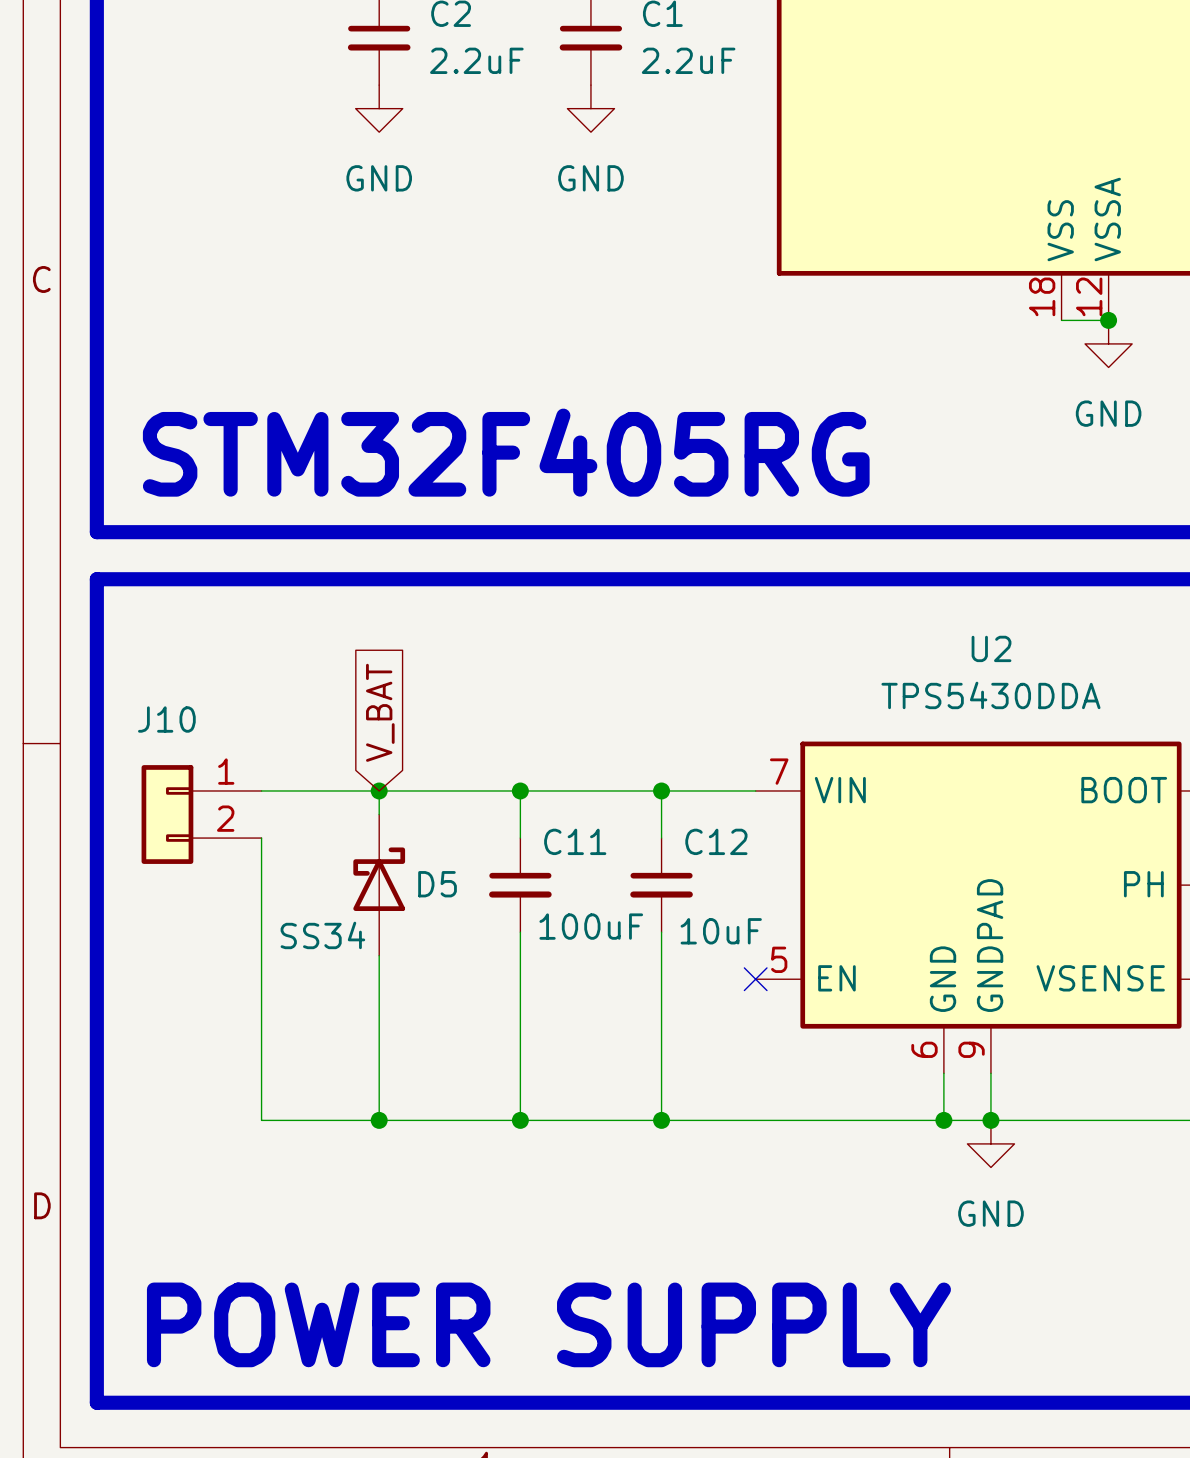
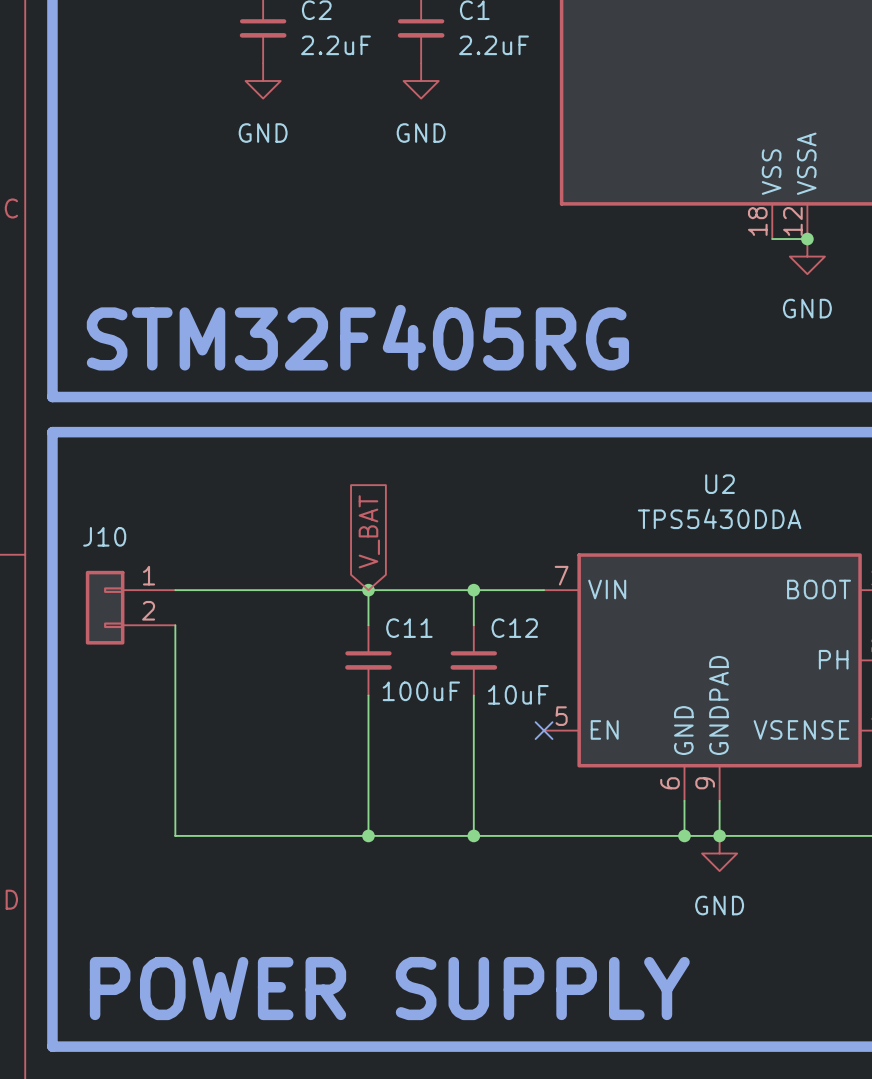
global label position: V_BAT (380, 712) -> V_BAT (369, 531)
wire: (379, 790) (379, 814) -> none
junction: (379, 790) -> none
D5: SS34 (379, 885) -> none
wire: (379, 955) (379, 1120) -> none
junction: (379, 1120) -> none

